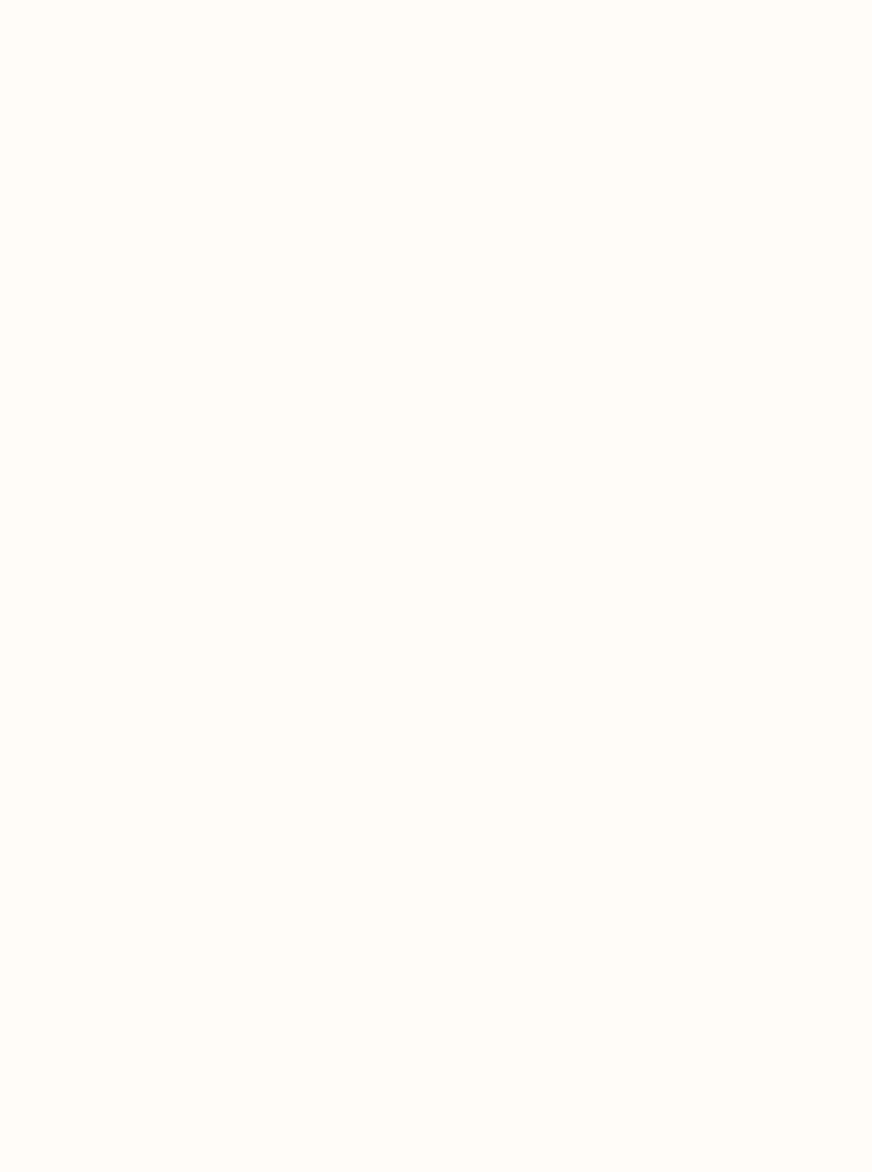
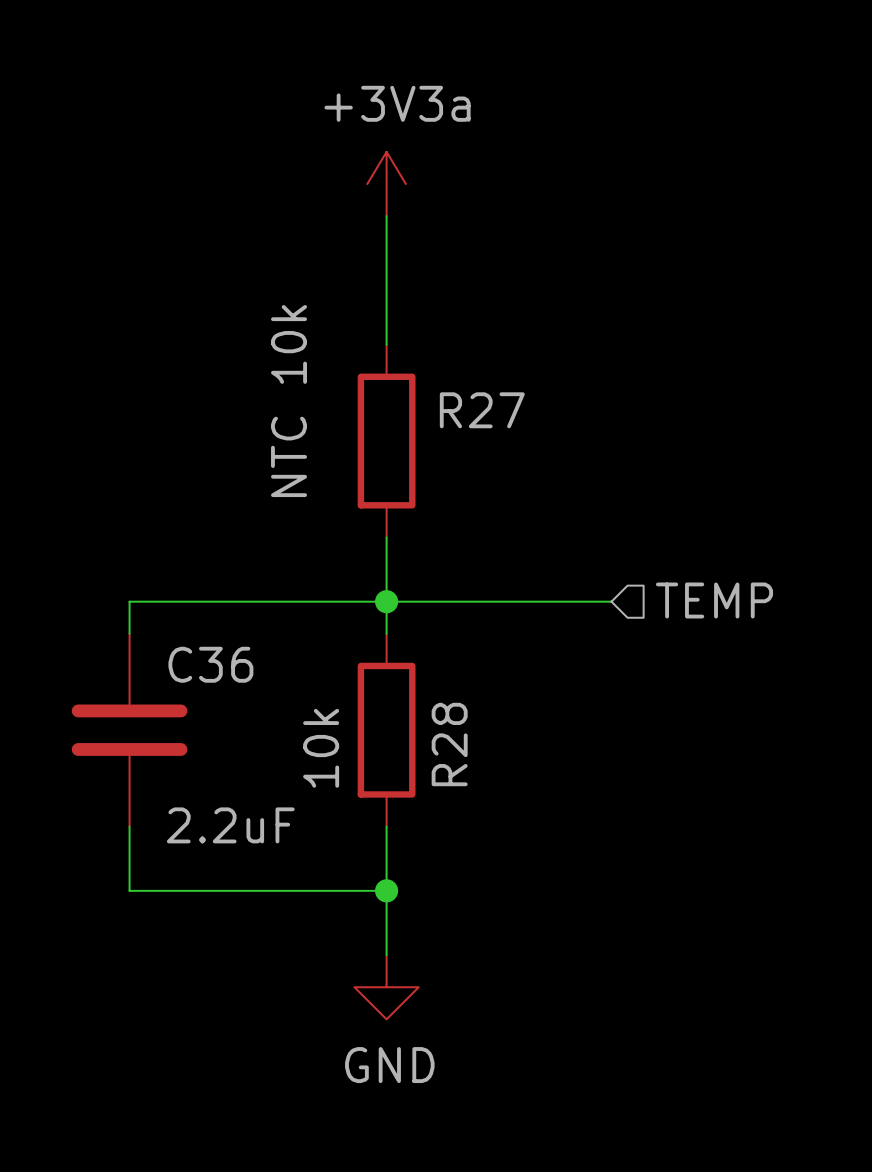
power symbol: none -> +3V3a (386, 184)
wire: none -> (386, 216) (386, 344)
R27: none -> NTC 10k (386, 441)
wire: none -> (386, 537) (386, 633)
hierarchical label: none -> TEMP (714, 600)
junction: none -> (386, 601)
wire: none -> (611, 601) (129, 601) (129, 633)
C36: none -> 2.2uF (129, 730)
R28: none -> 10k (386, 730)
wire: none -> (129, 826) (129, 890) (386, 890)
wire: none -> (386, 826) (386, 955)
junction: none -> (386, 890)
power symbol: none -> GND (386, 987)

